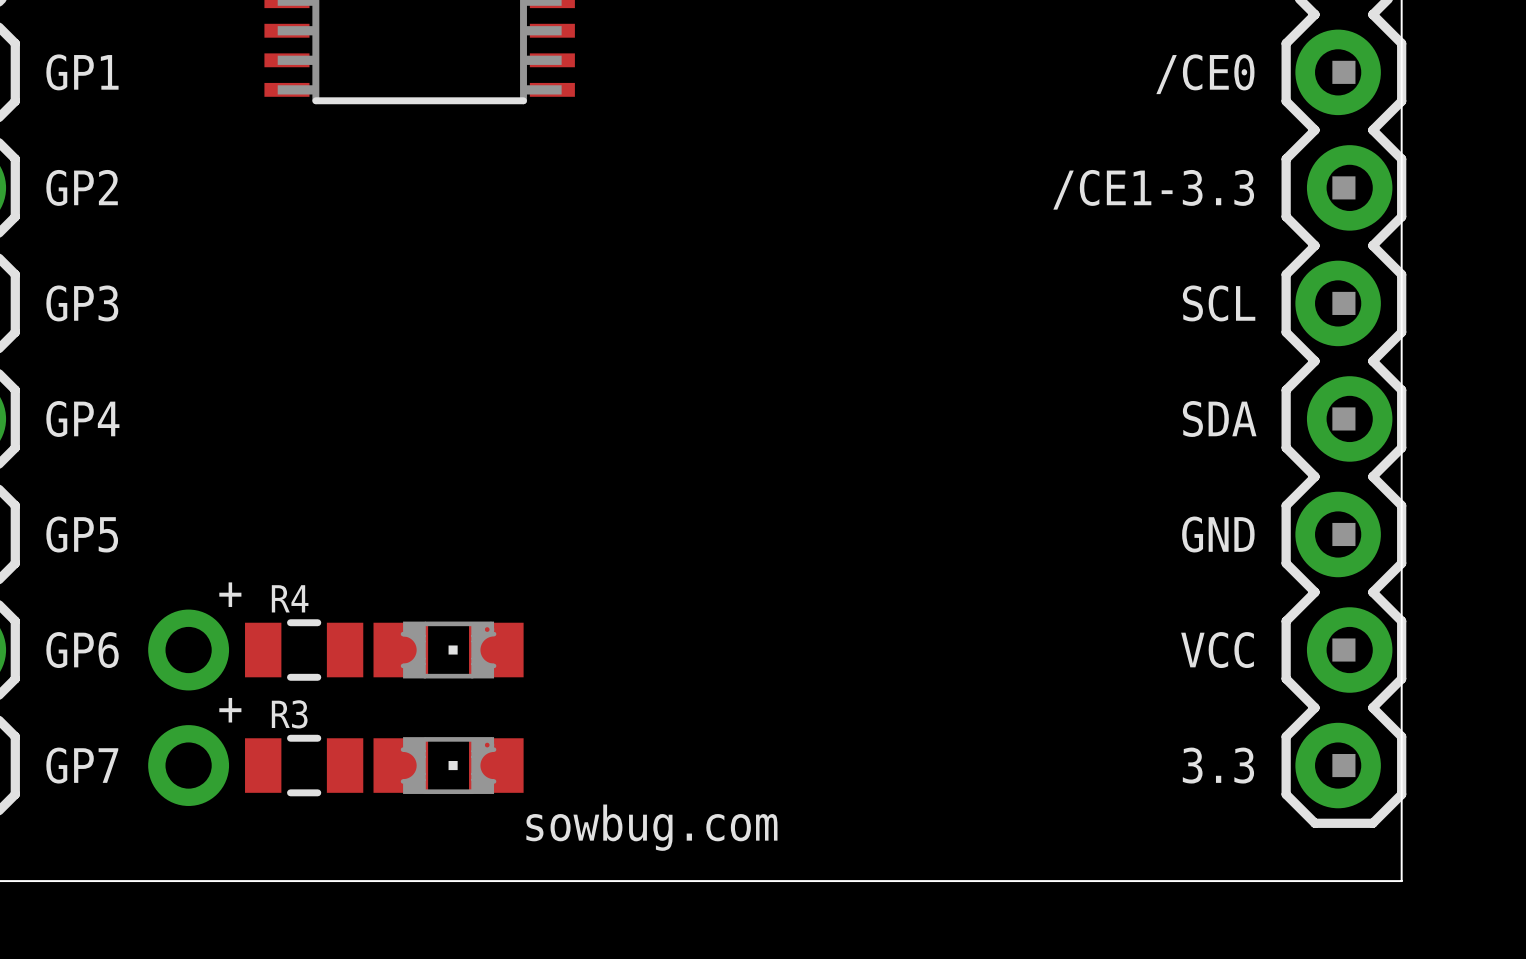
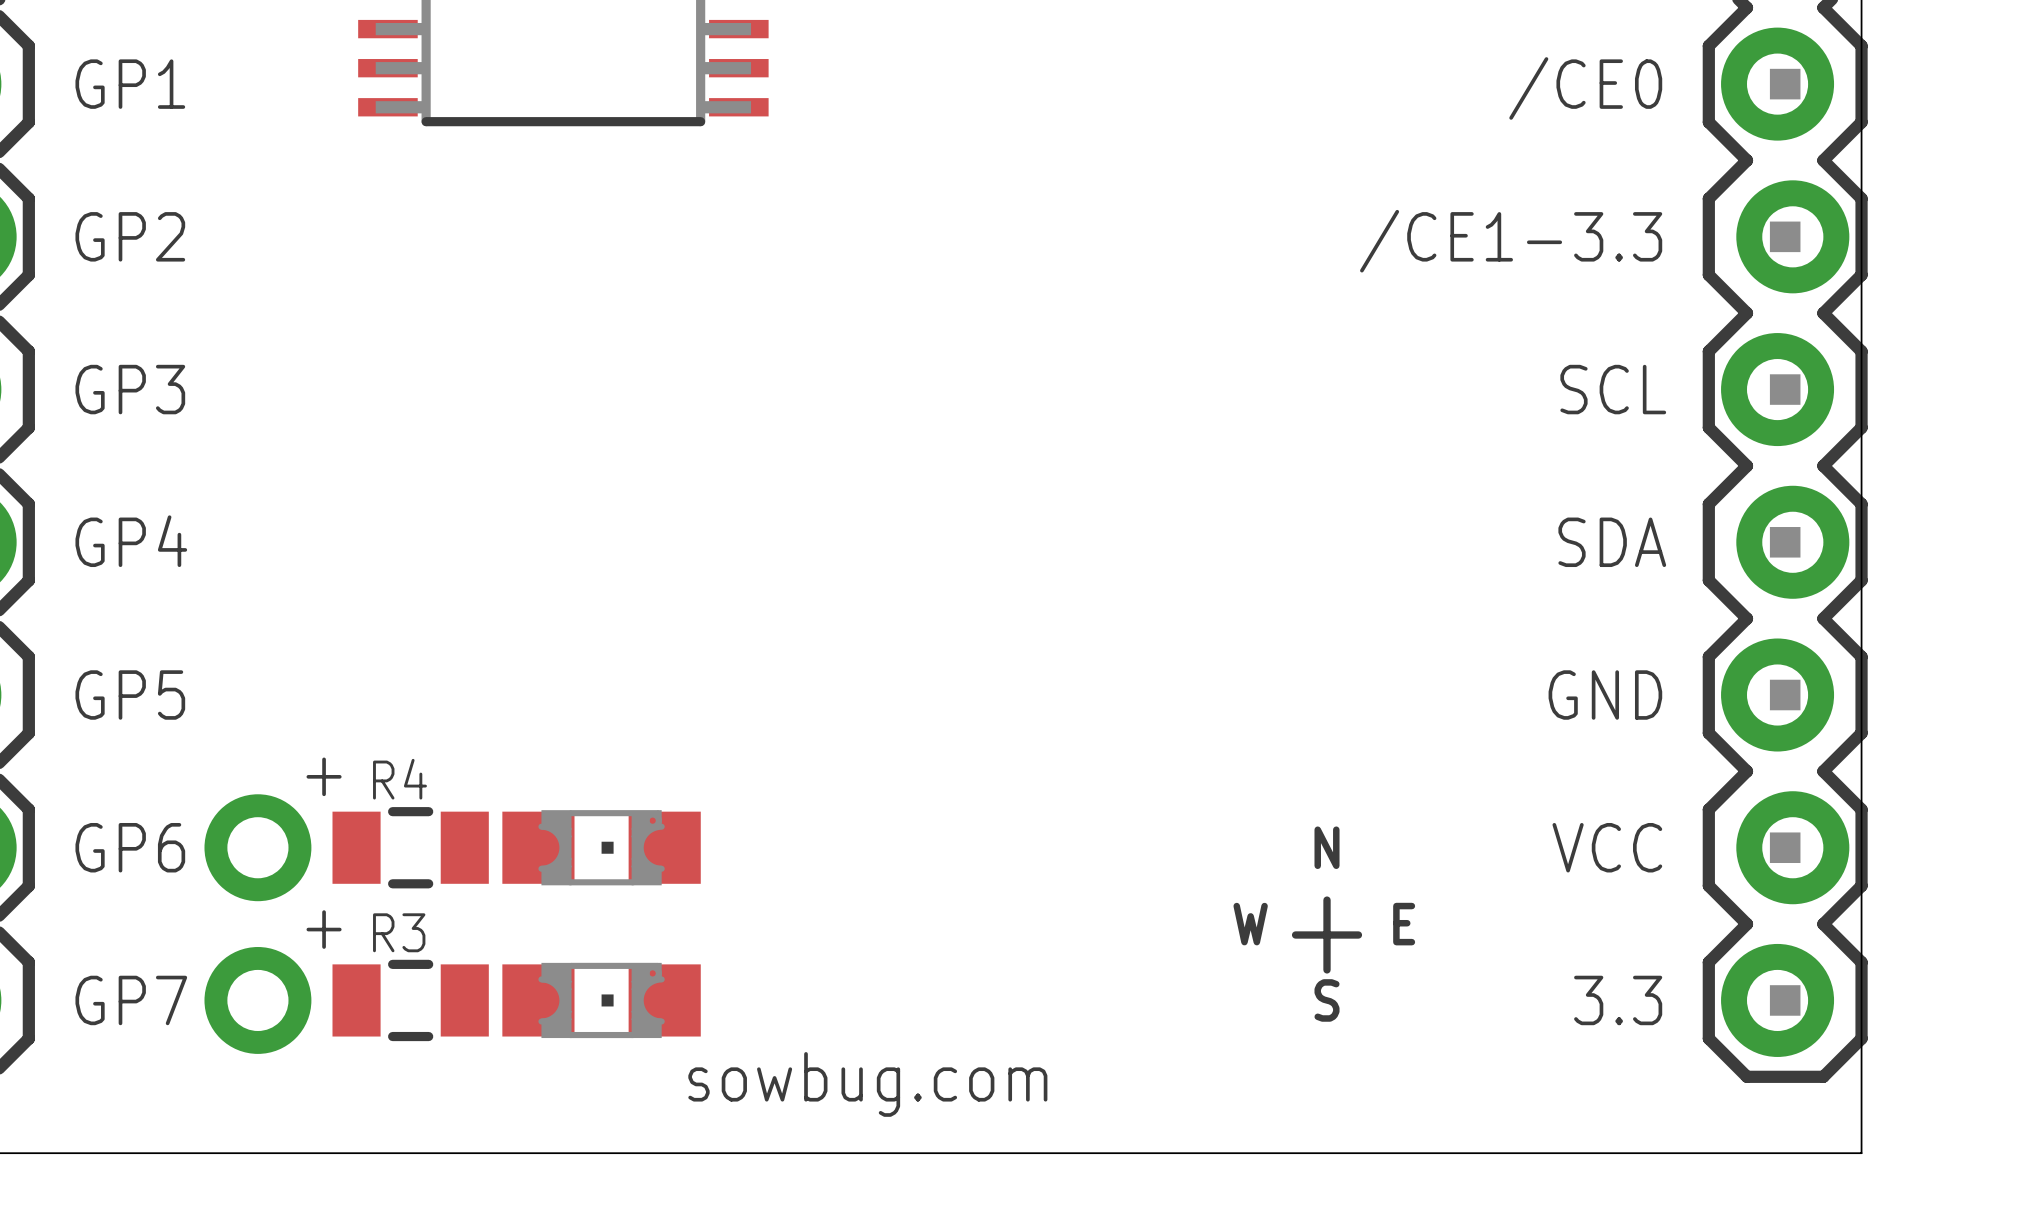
text: none -> N (1327, 847)
text: none -> W (1250, 924)
text: none -> E (1404, 924)
text: none -> + (1327, 935)
text: none -> S (1327, 1000)

